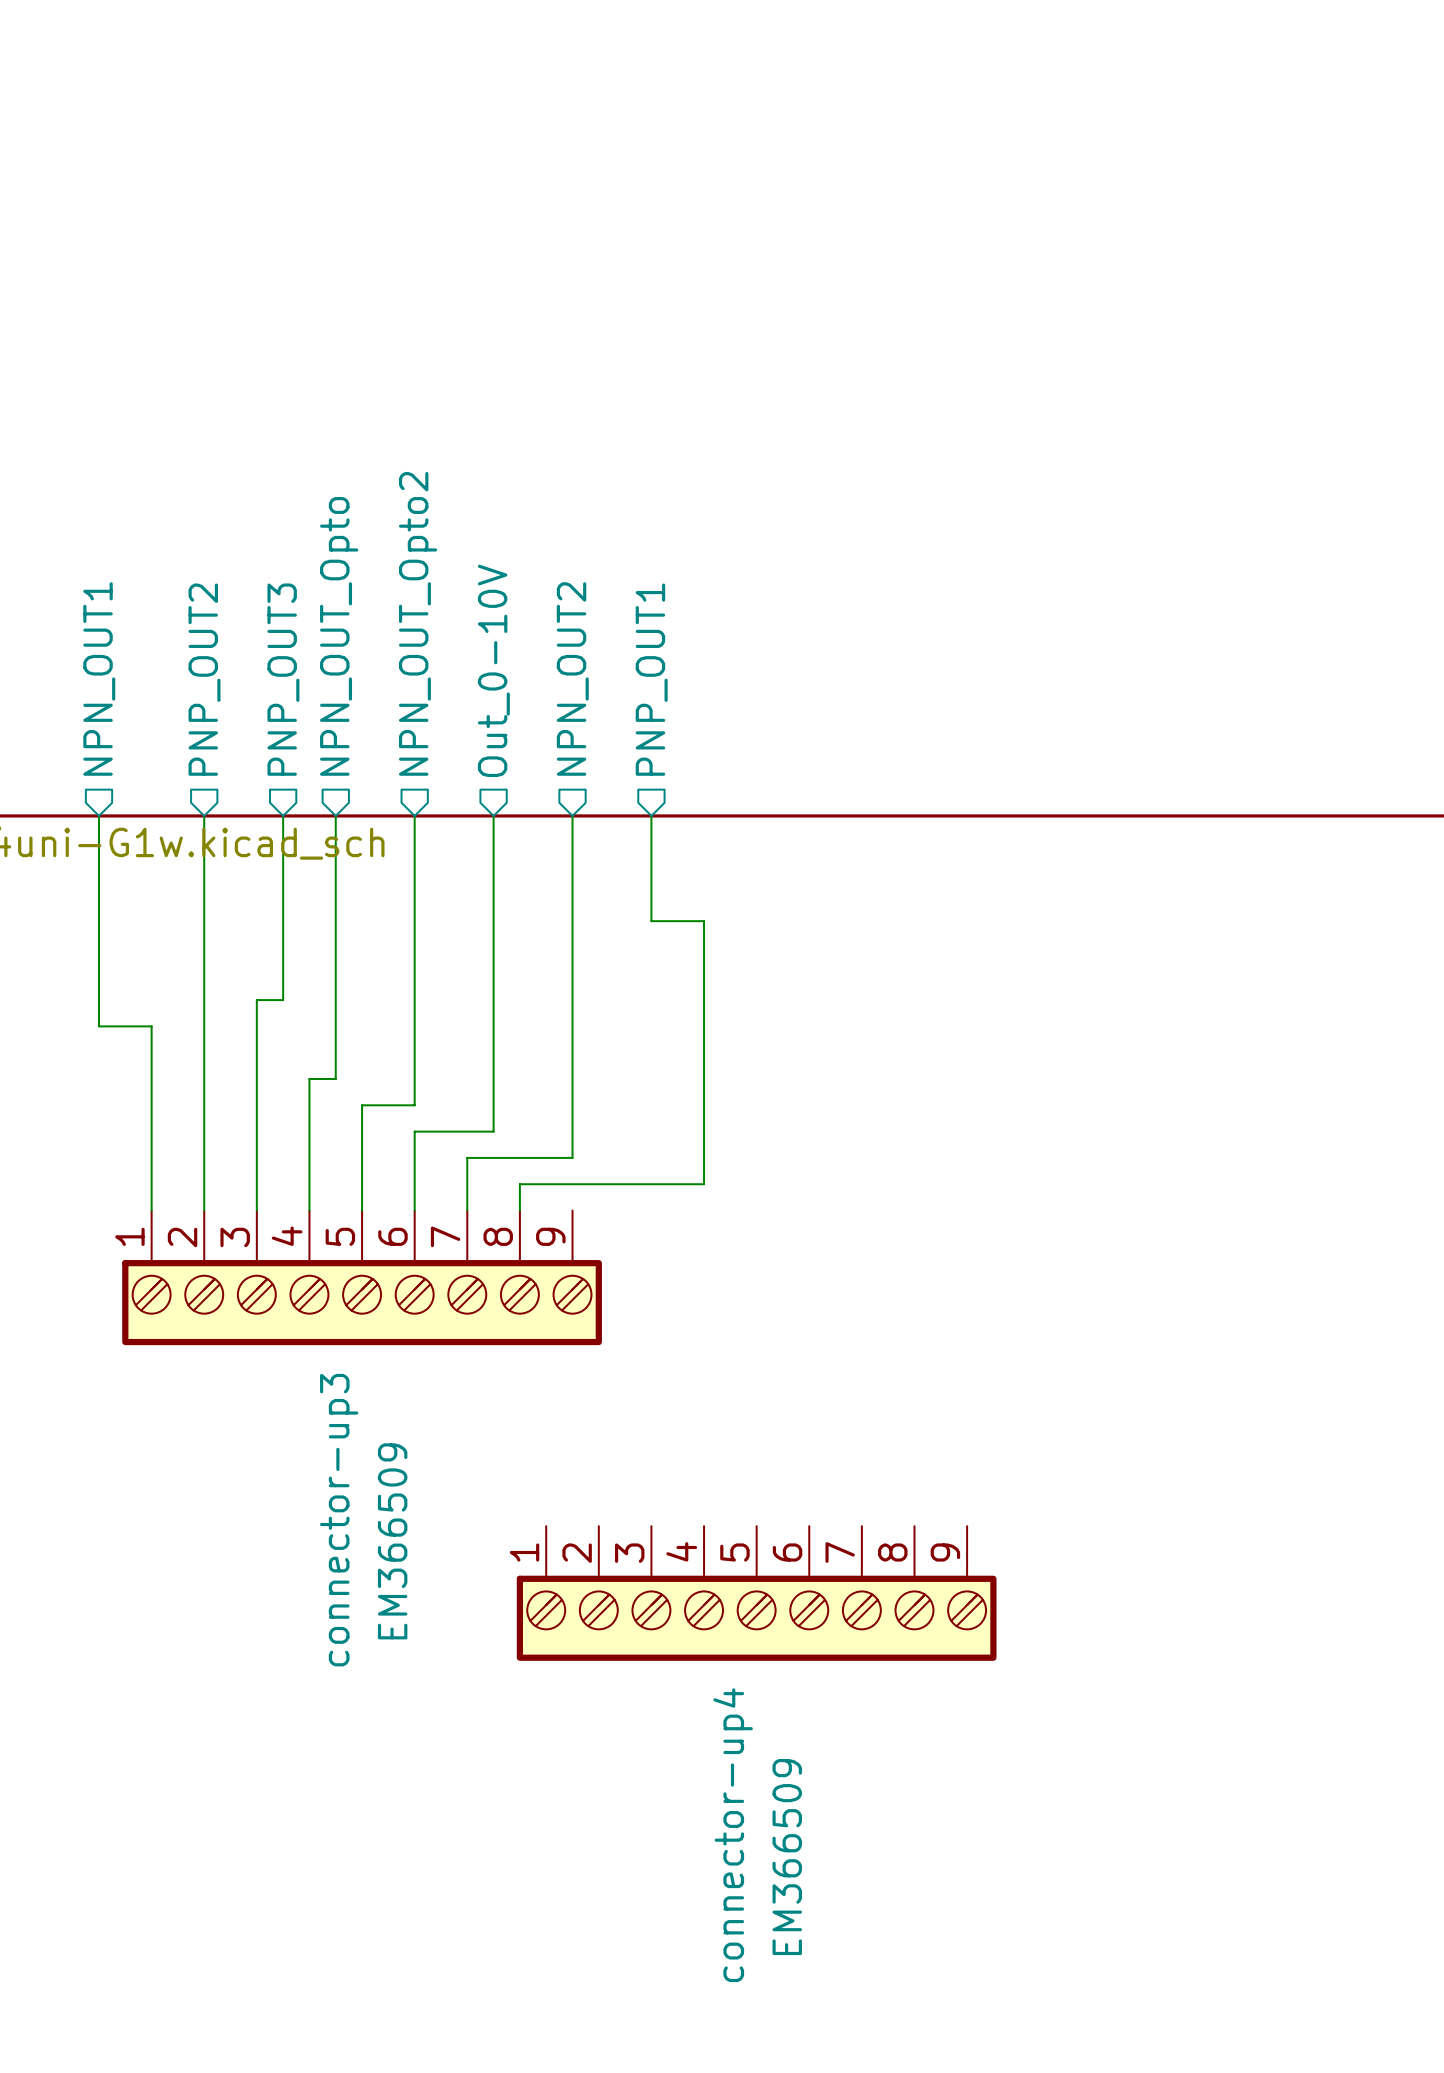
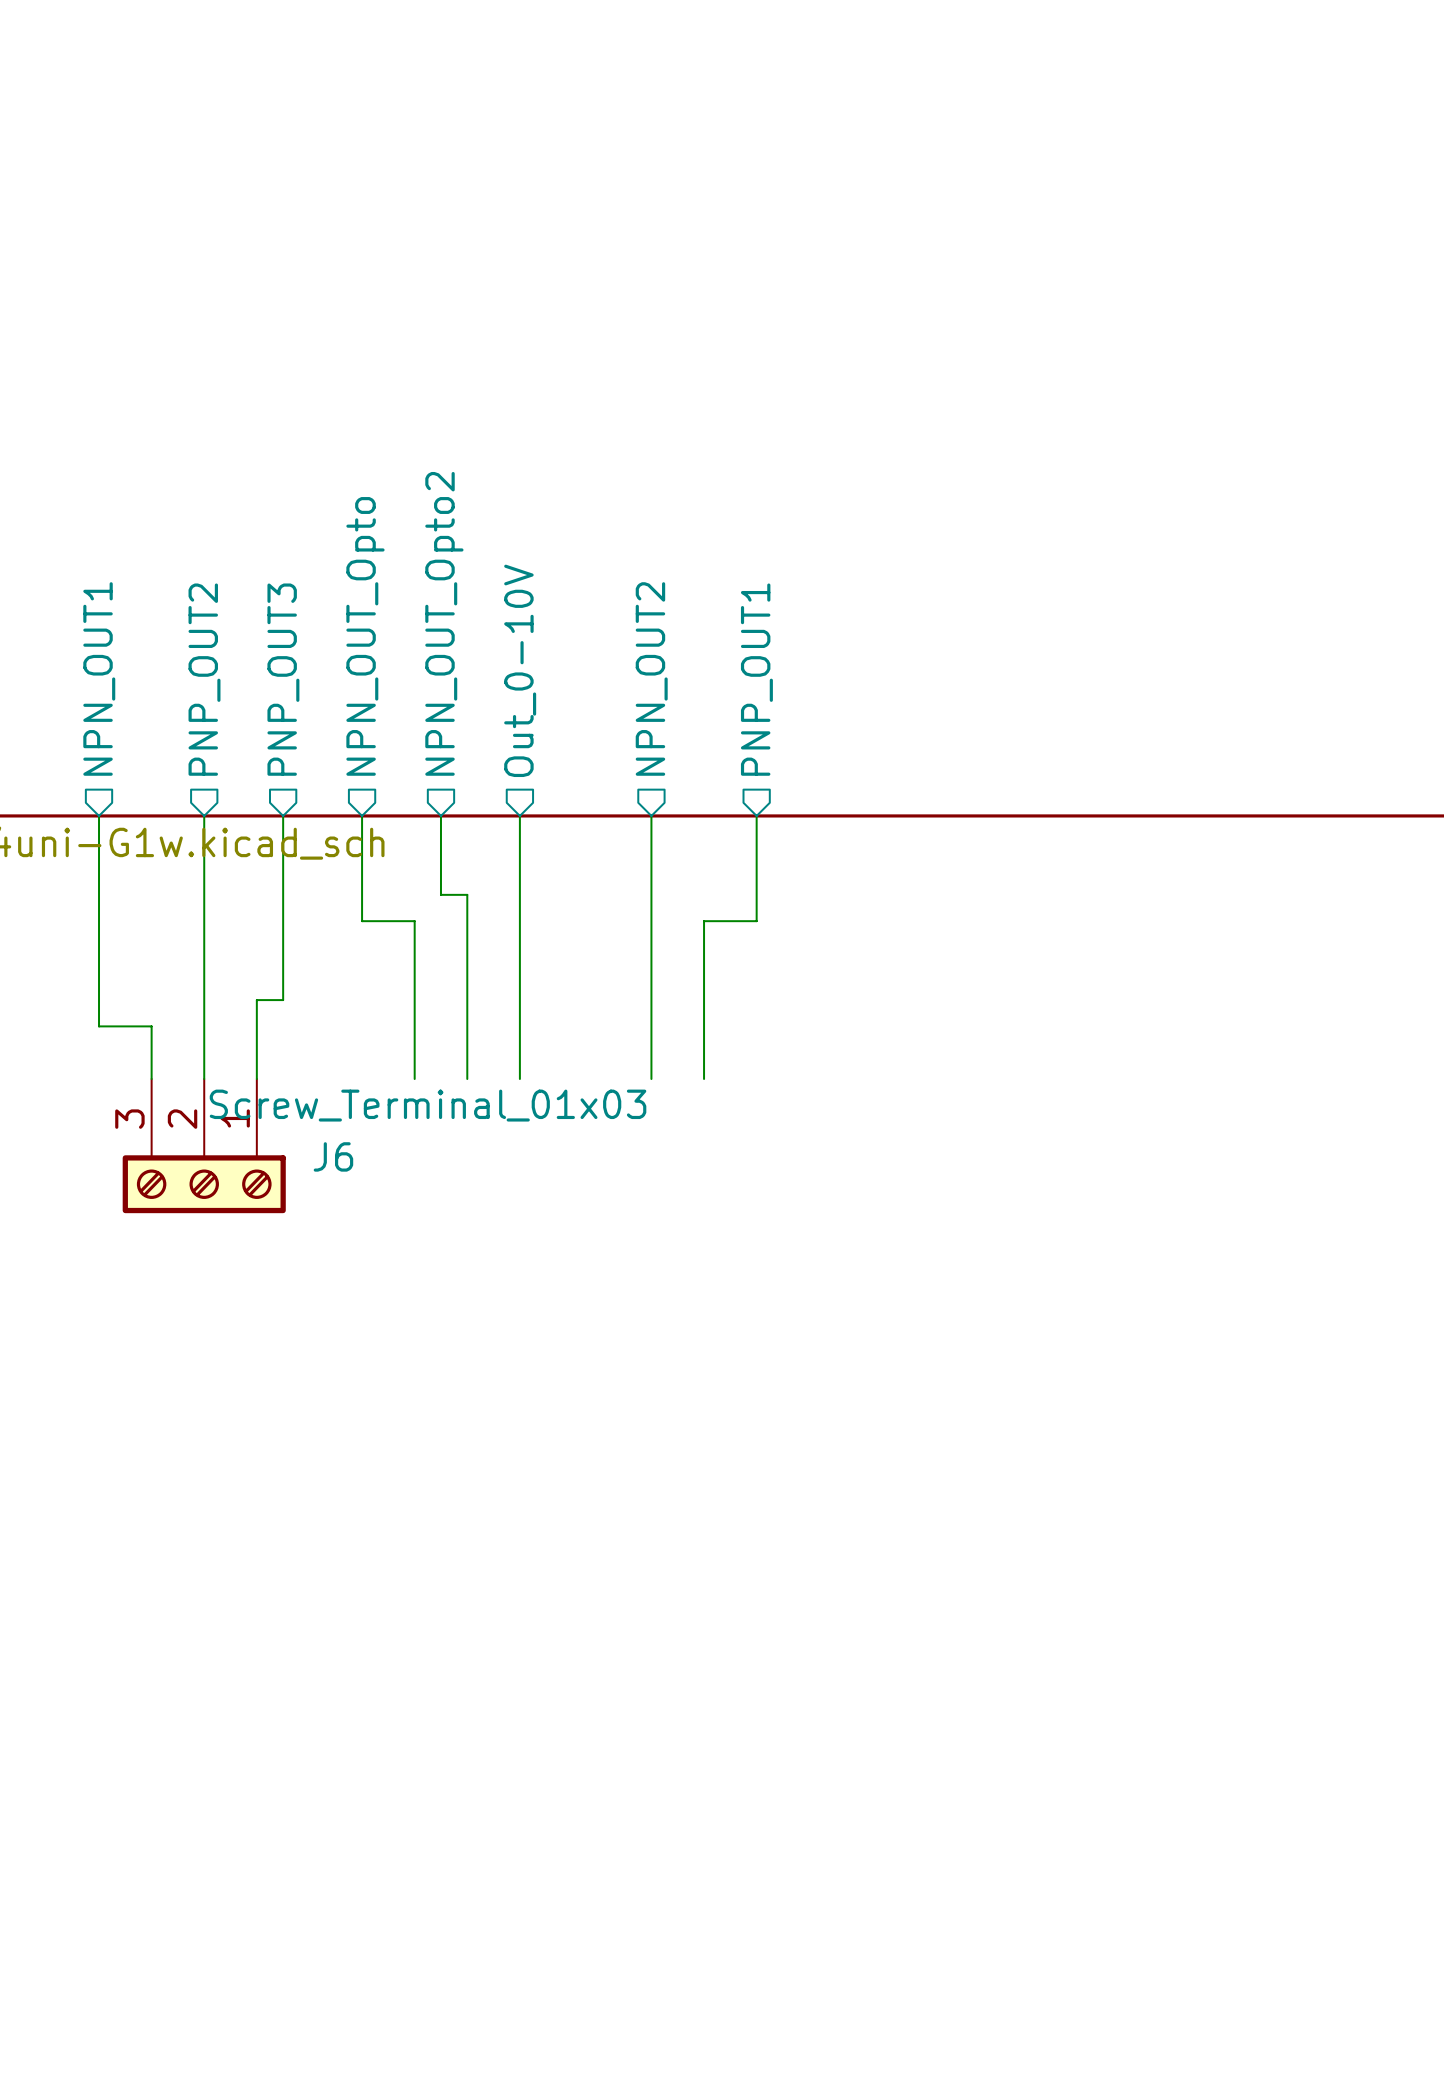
sheet pin position: NPN_OUT_Opto2 (418, 623) -> NPN_OUT_Opto2 (444, 623)
sheet pin position: NPN_OUT_Opto (339, 636) -> NPN_OUT_Opto (365, 636)
sheet pin position: Out_0-10V (493, 670) -> Out_0-10V (520, 670)
sheet pin: NPN_OUT2 (572, 678) -> none
sheet pin: PNP_OUT1 (651, 679) -> NPN_OUT2 (651, 678)
sheet pin: none -> PNP_OUT1 (756, 679)
wire: (335, 815) (335, 1079) (309, 1079) (309, 1210) -> none
wire: (414, 815) (414, 921) -> (362, 815) (362, 921) (414, 921)
wire: none -> (440, 815) (440, 894) (467, 894) (467, 1079)
wire: (493, 815) (493, 1131) (414, 1131) (414, 1210) -> none
wire: none -> (519, 815) (519, 1079)
wire: (572, 815) (572, 1157) (467, 1157) (467, 1210) -> none
wire: (651, 921) (704, 921) -> (756, 815) (756, 921) (704, 921)
wire: none -> (651, 921) (651, 1079)
wire: (414, 1079) (414, 1105) (362, 1105) (362, 1210) -> none
wire: (704, 1079) (704, 1184) (519, 1184) (519, 1210) -> none
J6: none -> Screw_Terminal_01x03 (204, 1146)
connector-up3: (362, 1277) -> none
connector-up4: (756, 1593) -> none

